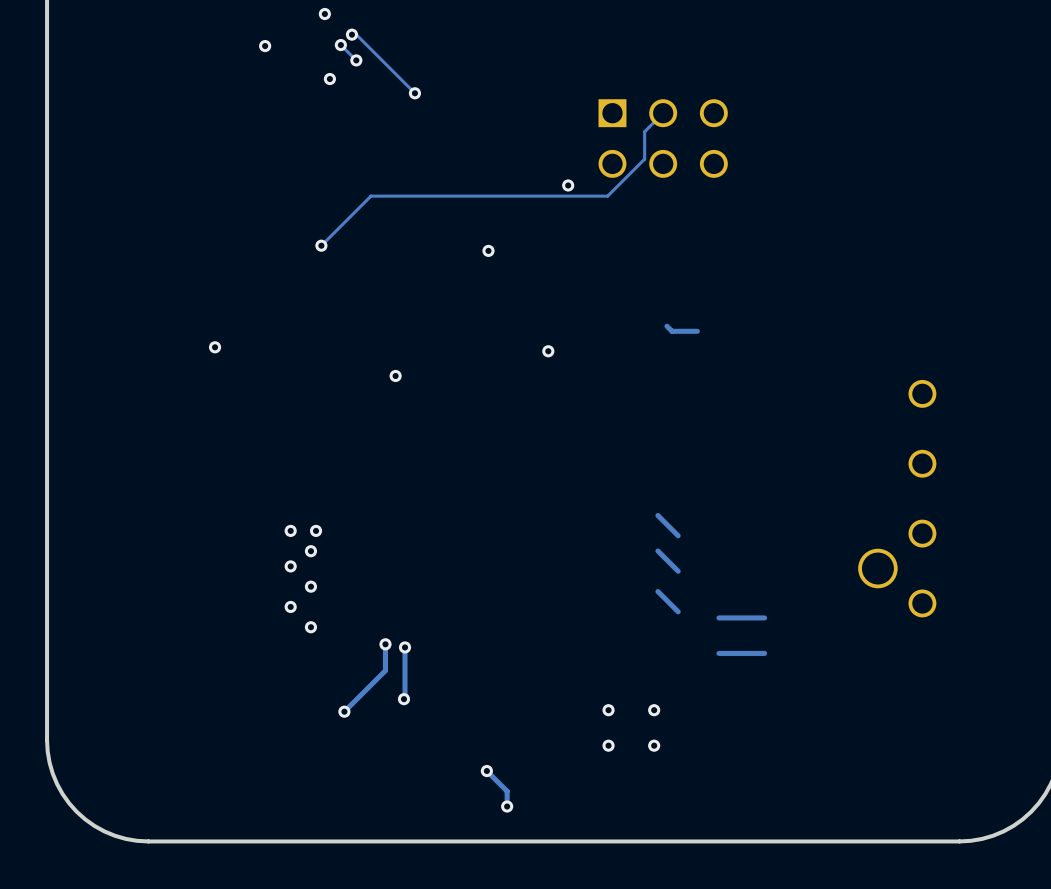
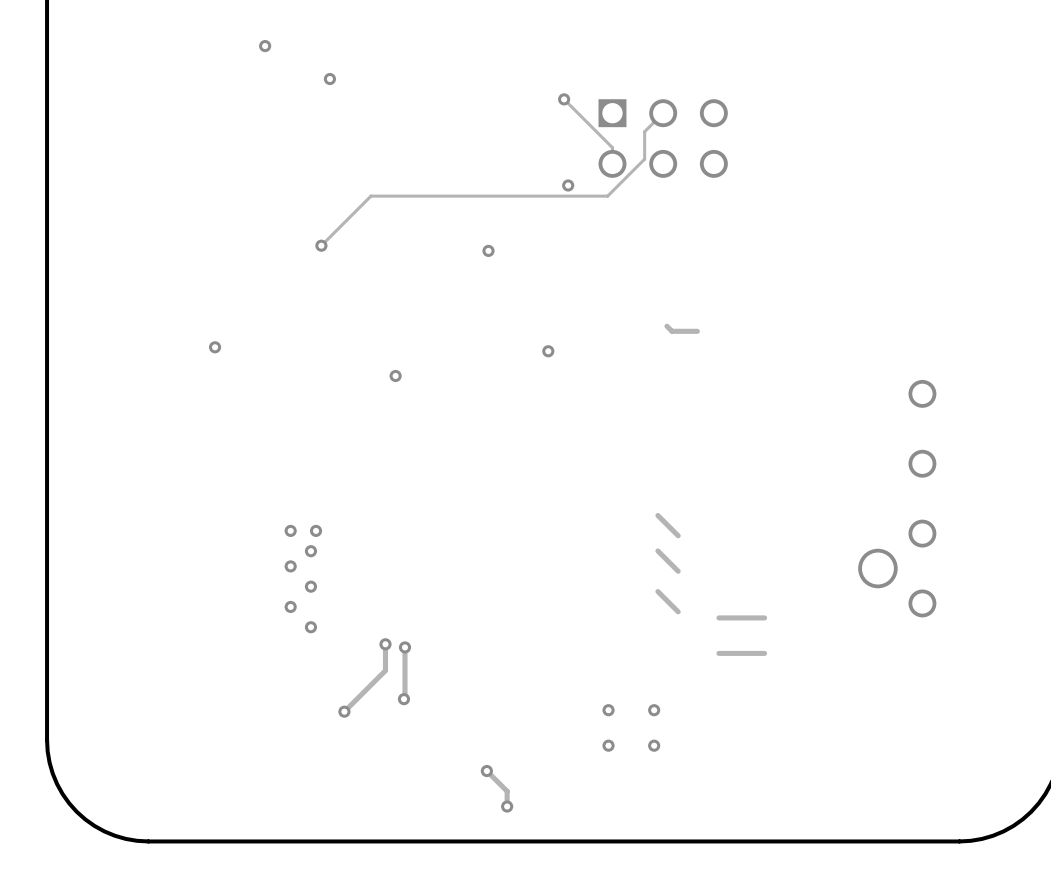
via: (324, 14) -> none
track: (351, 34) (356, 34) (414, 93) -> none
via: (351, 34) -> none
track: (340, 45) (356, 60) -> none
via: (340, 45) -> none
via: (356, 60) -> none
via: (414, 93) -> none
track: none -> (564, 99) (612, 147) (612, 163)
via: none -> (564, 99)

